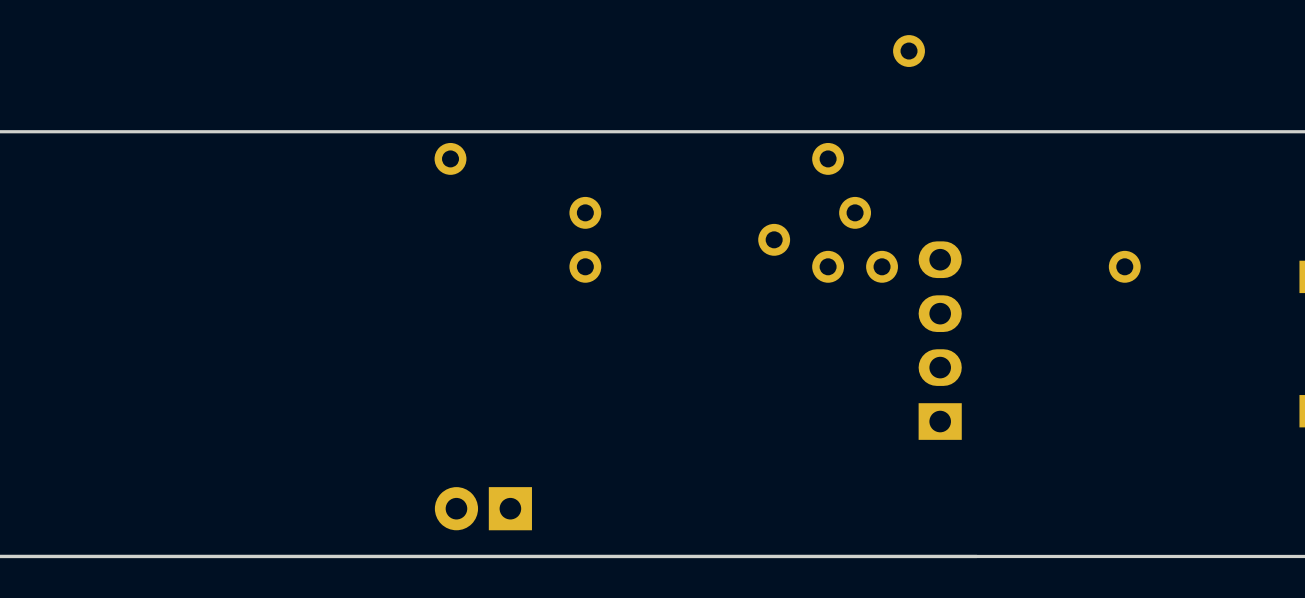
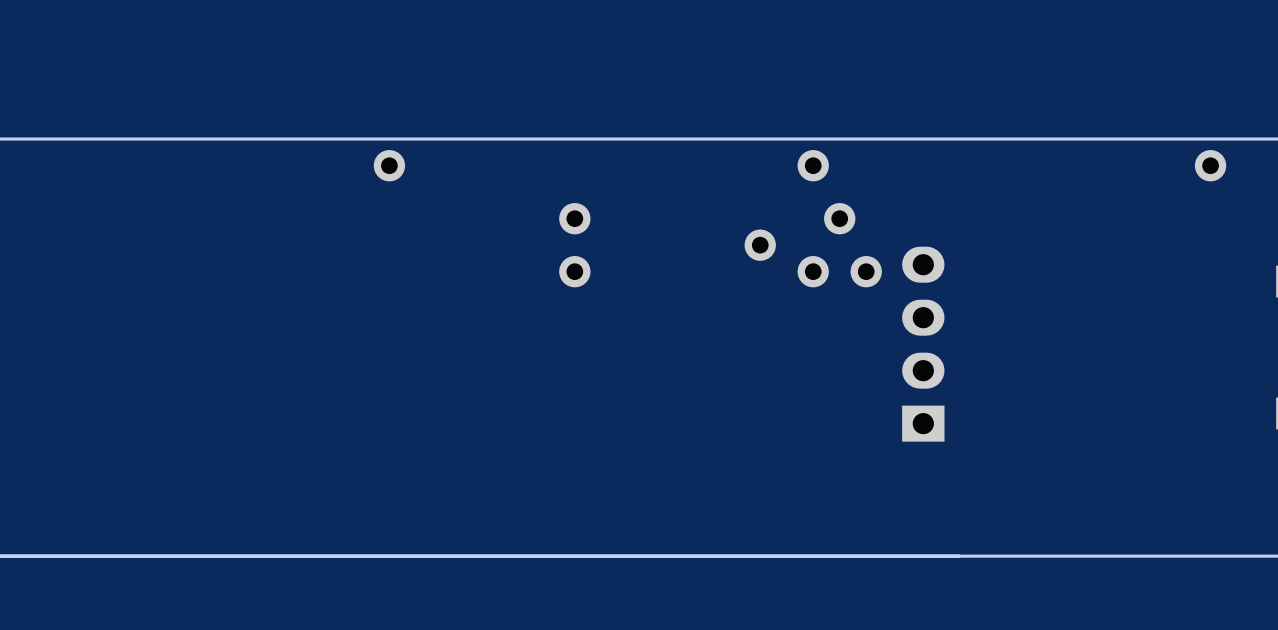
part: (909, 51) -> none
part position: (450, 158) -> (389, 165)
part: none -> (1210, 165)
part: (1124, 266) -> none
part: (483, 508) -> none

